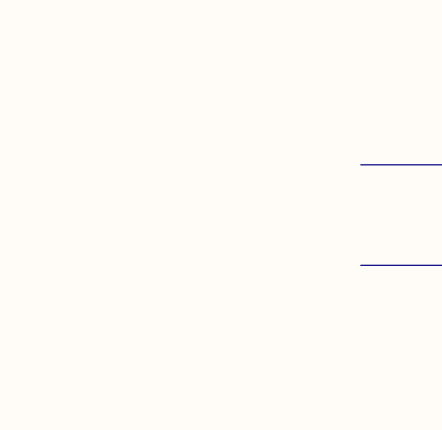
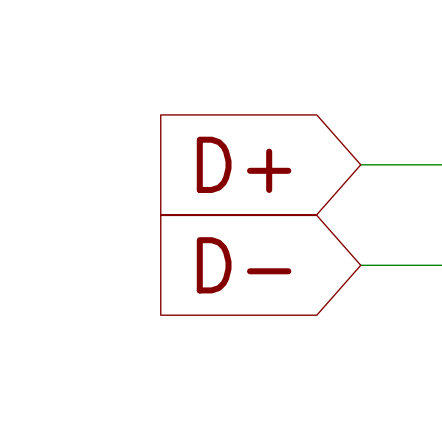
global label: none -> D+ (244, 164)
global label: none -> D- (244, 265)

